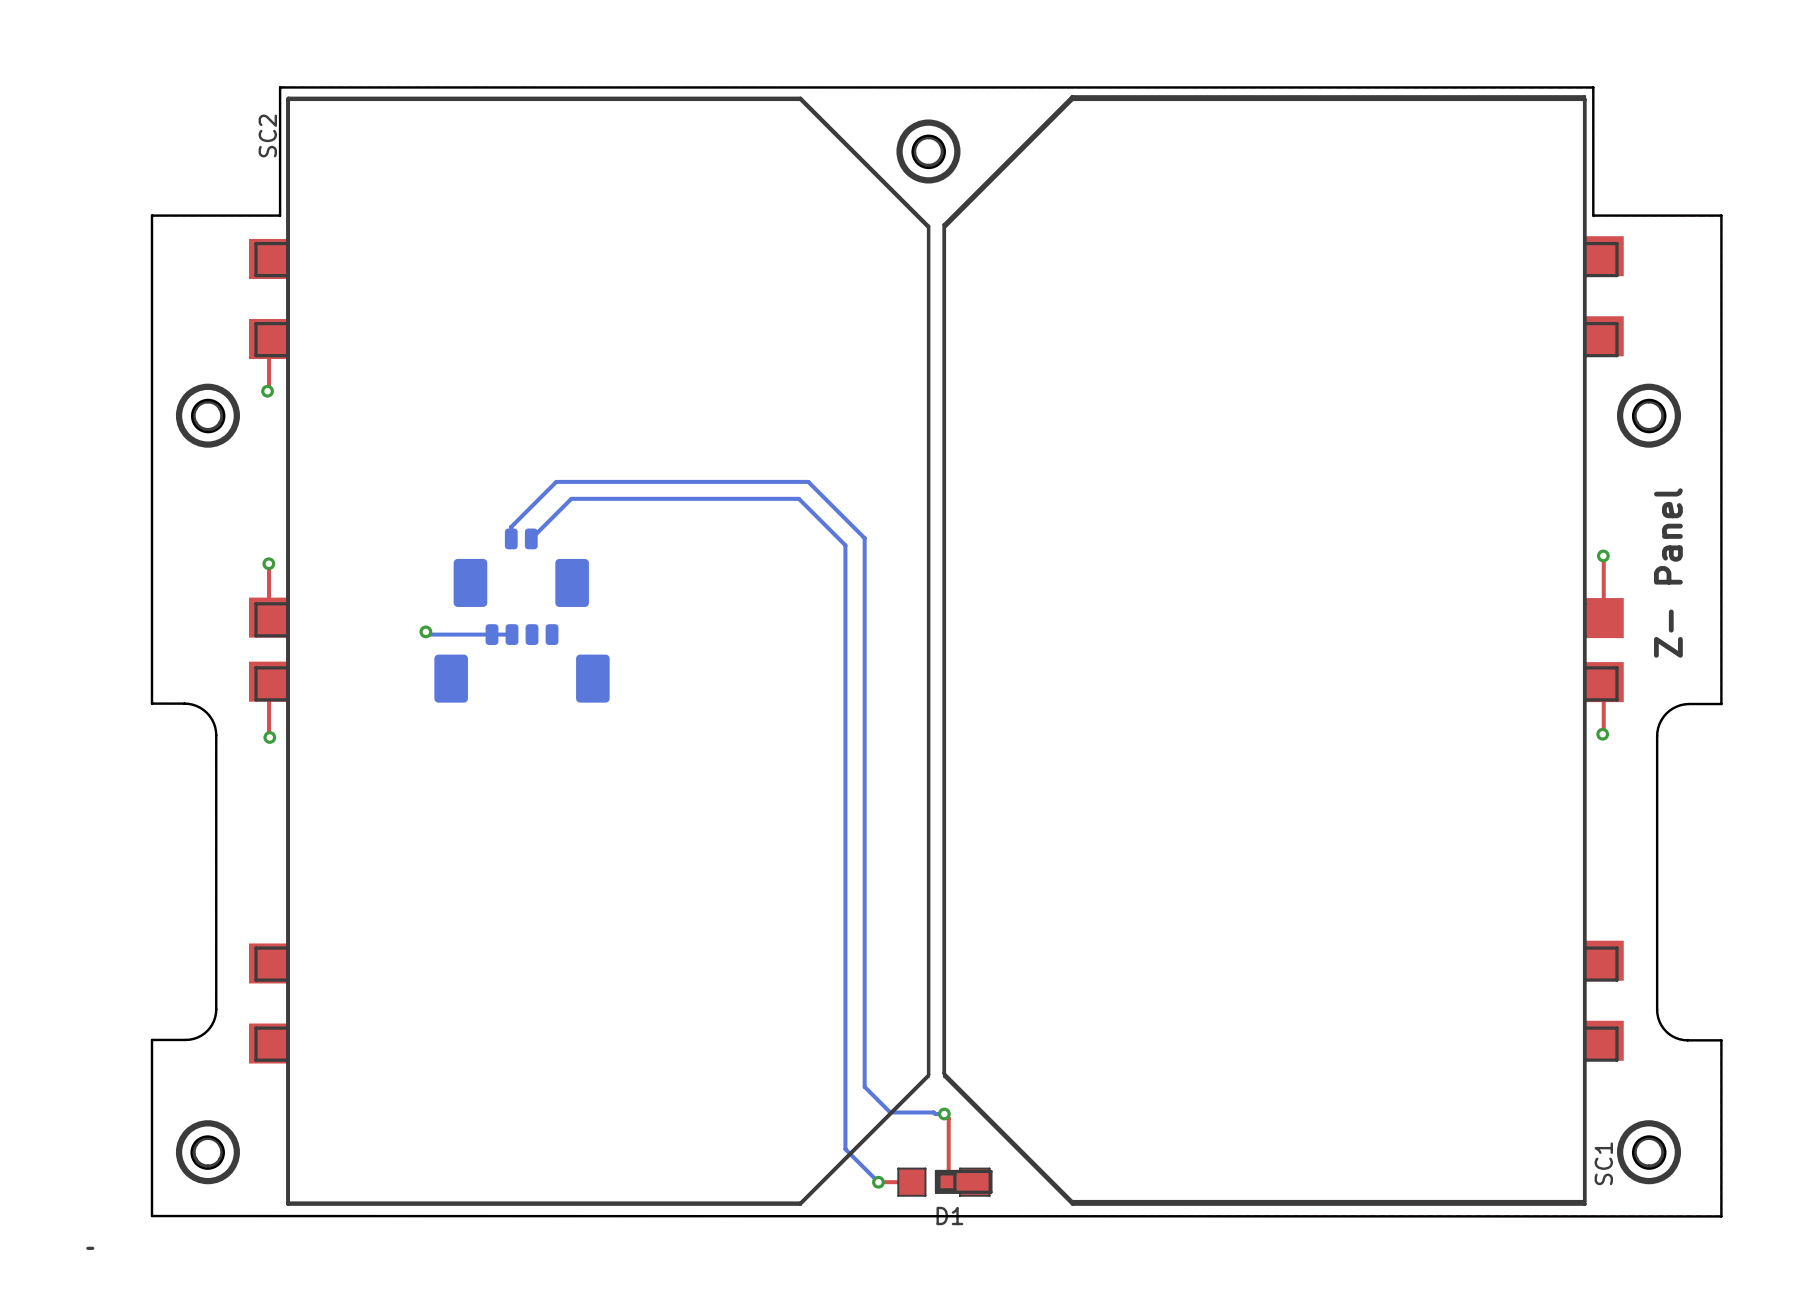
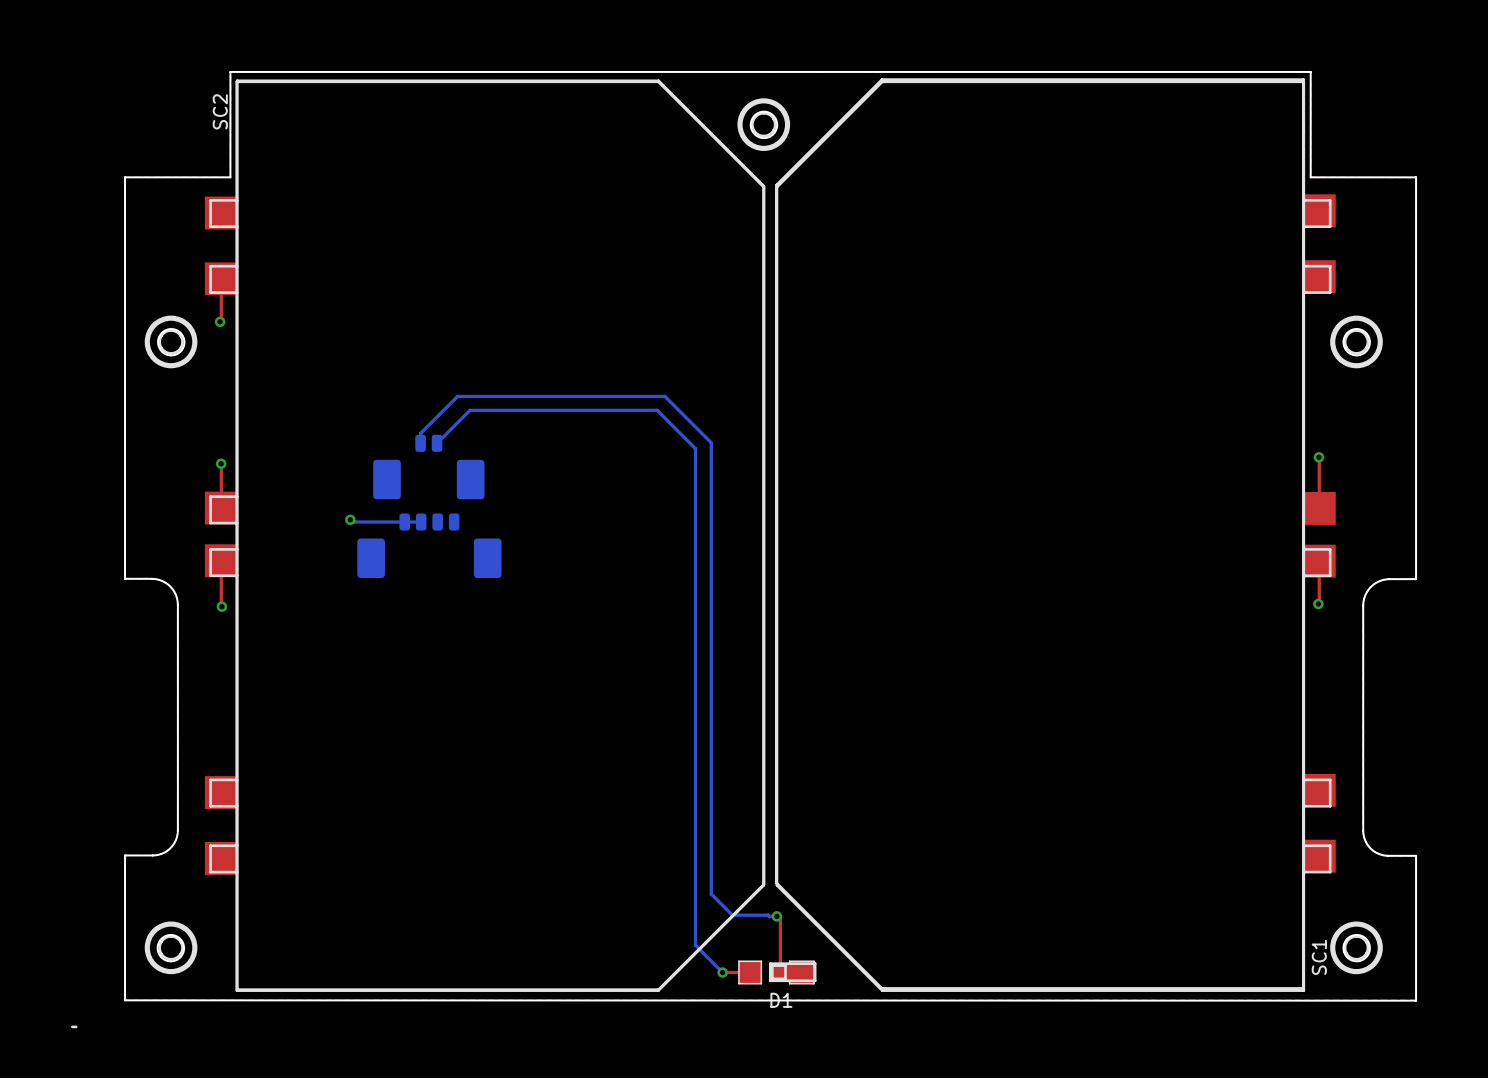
text: Z- Panel (1668, 573) -> none

